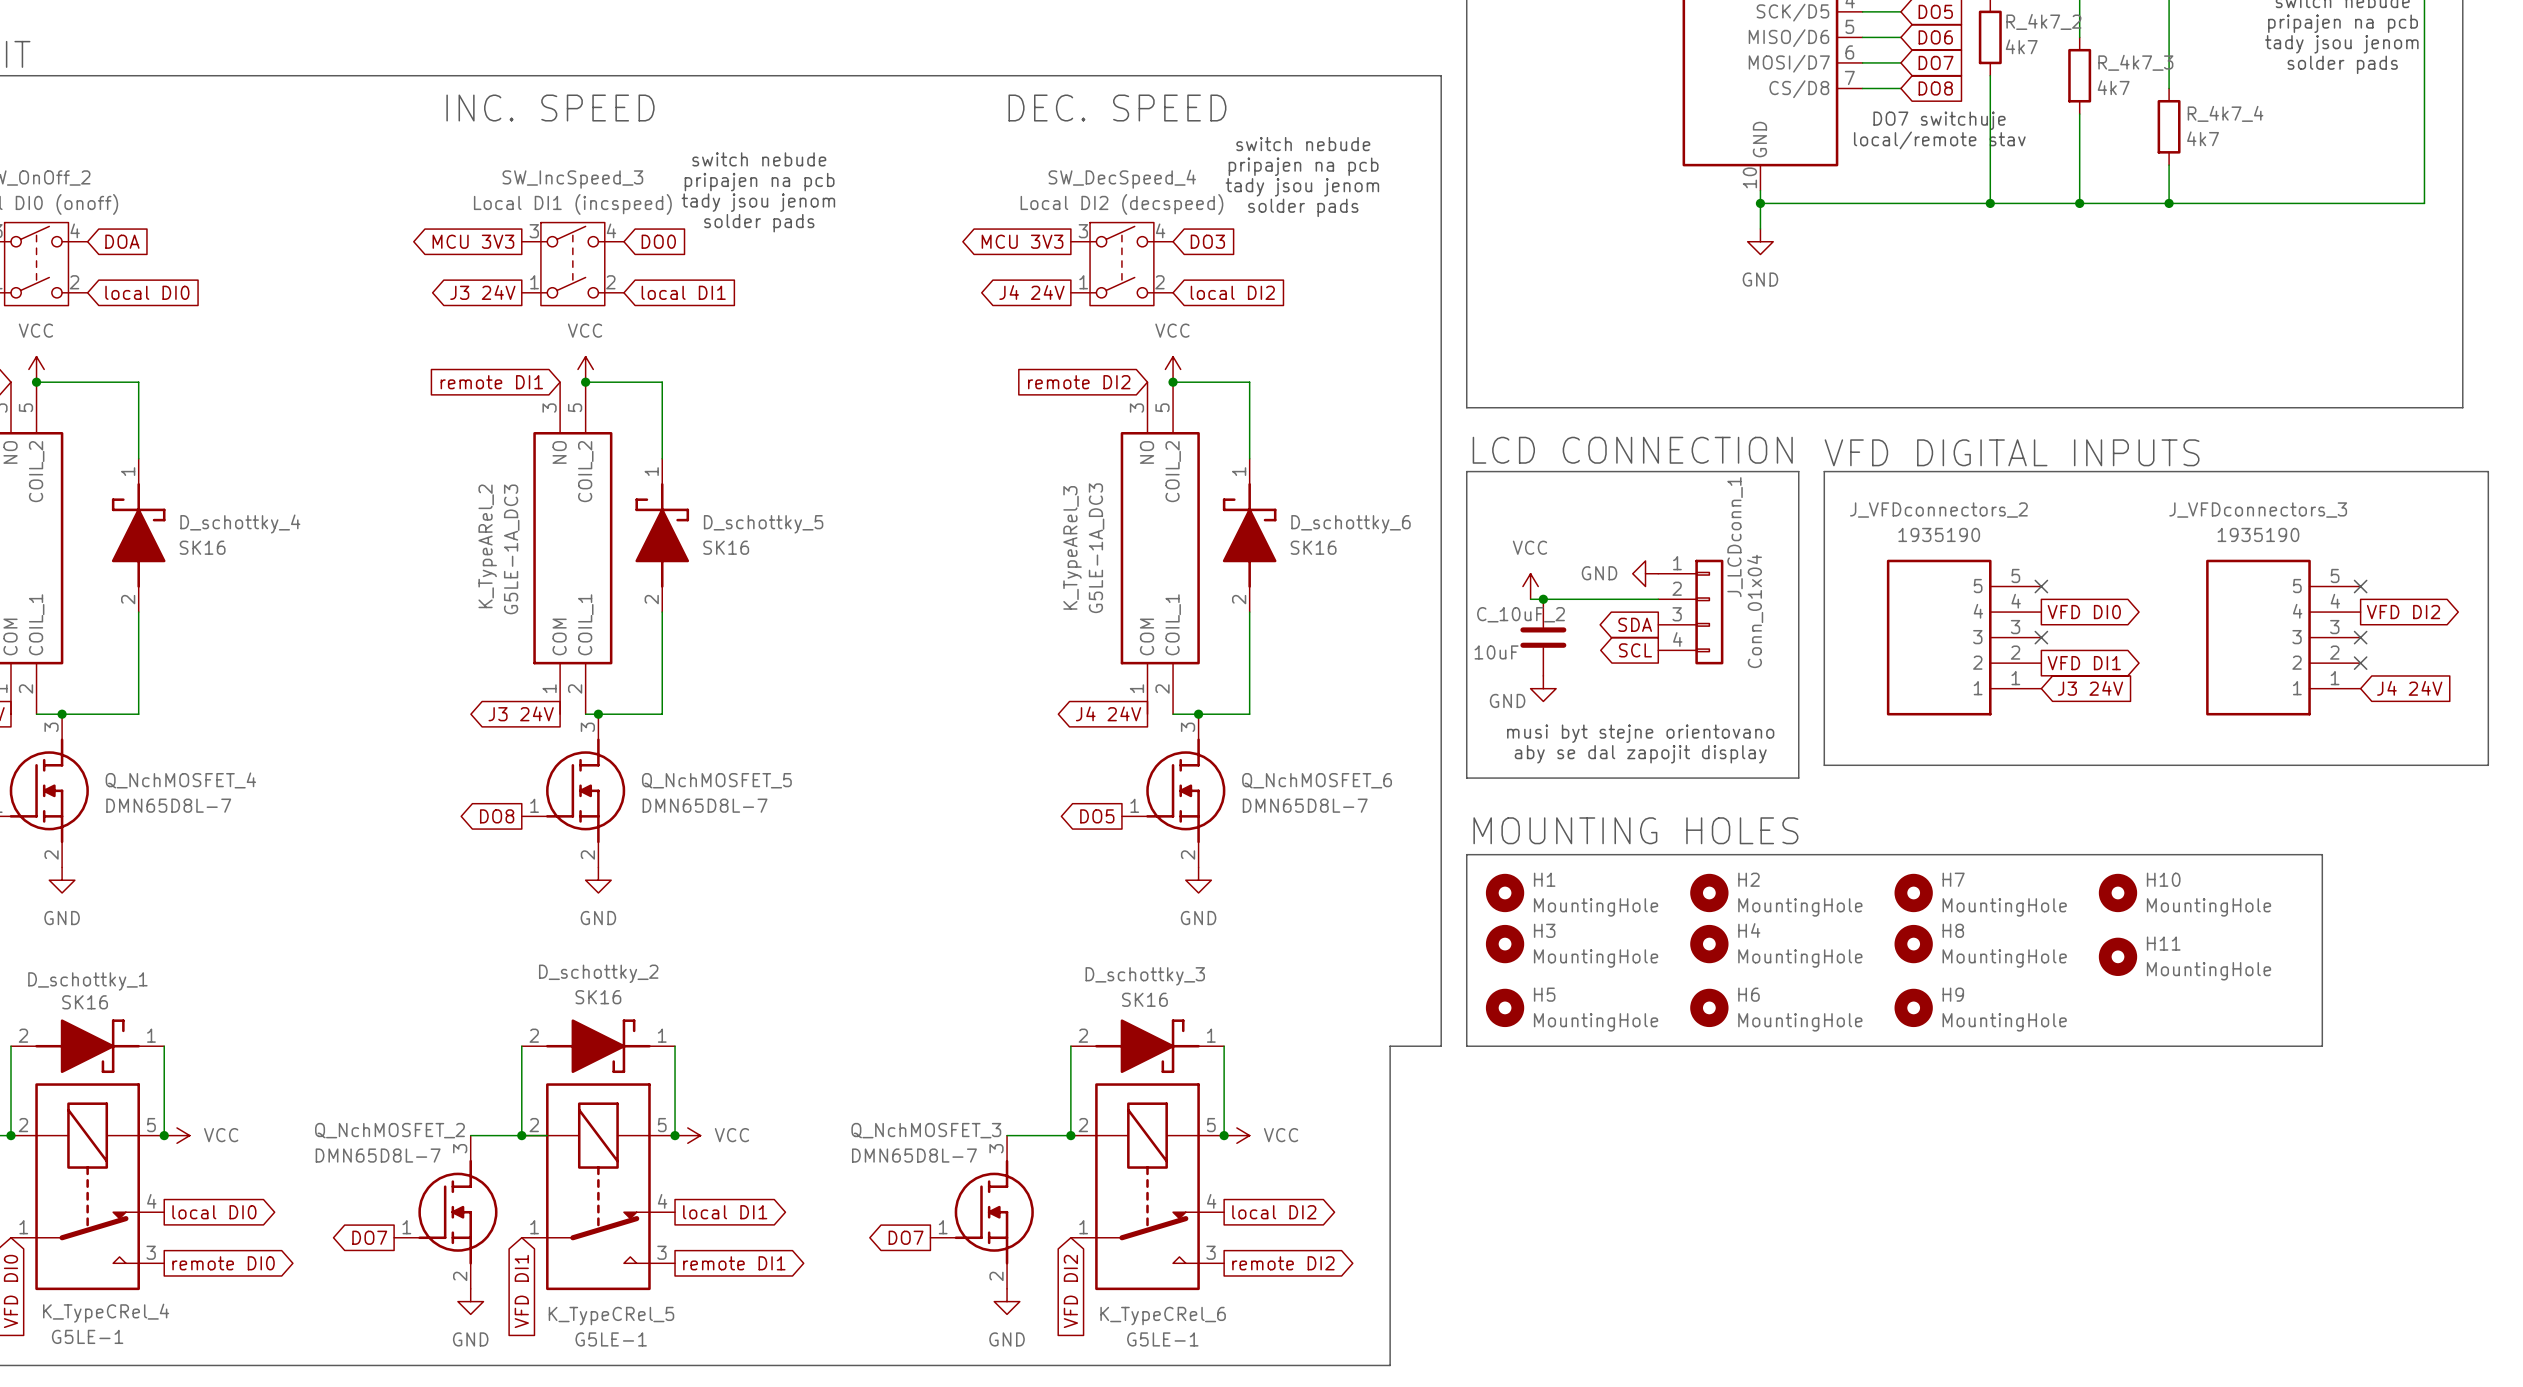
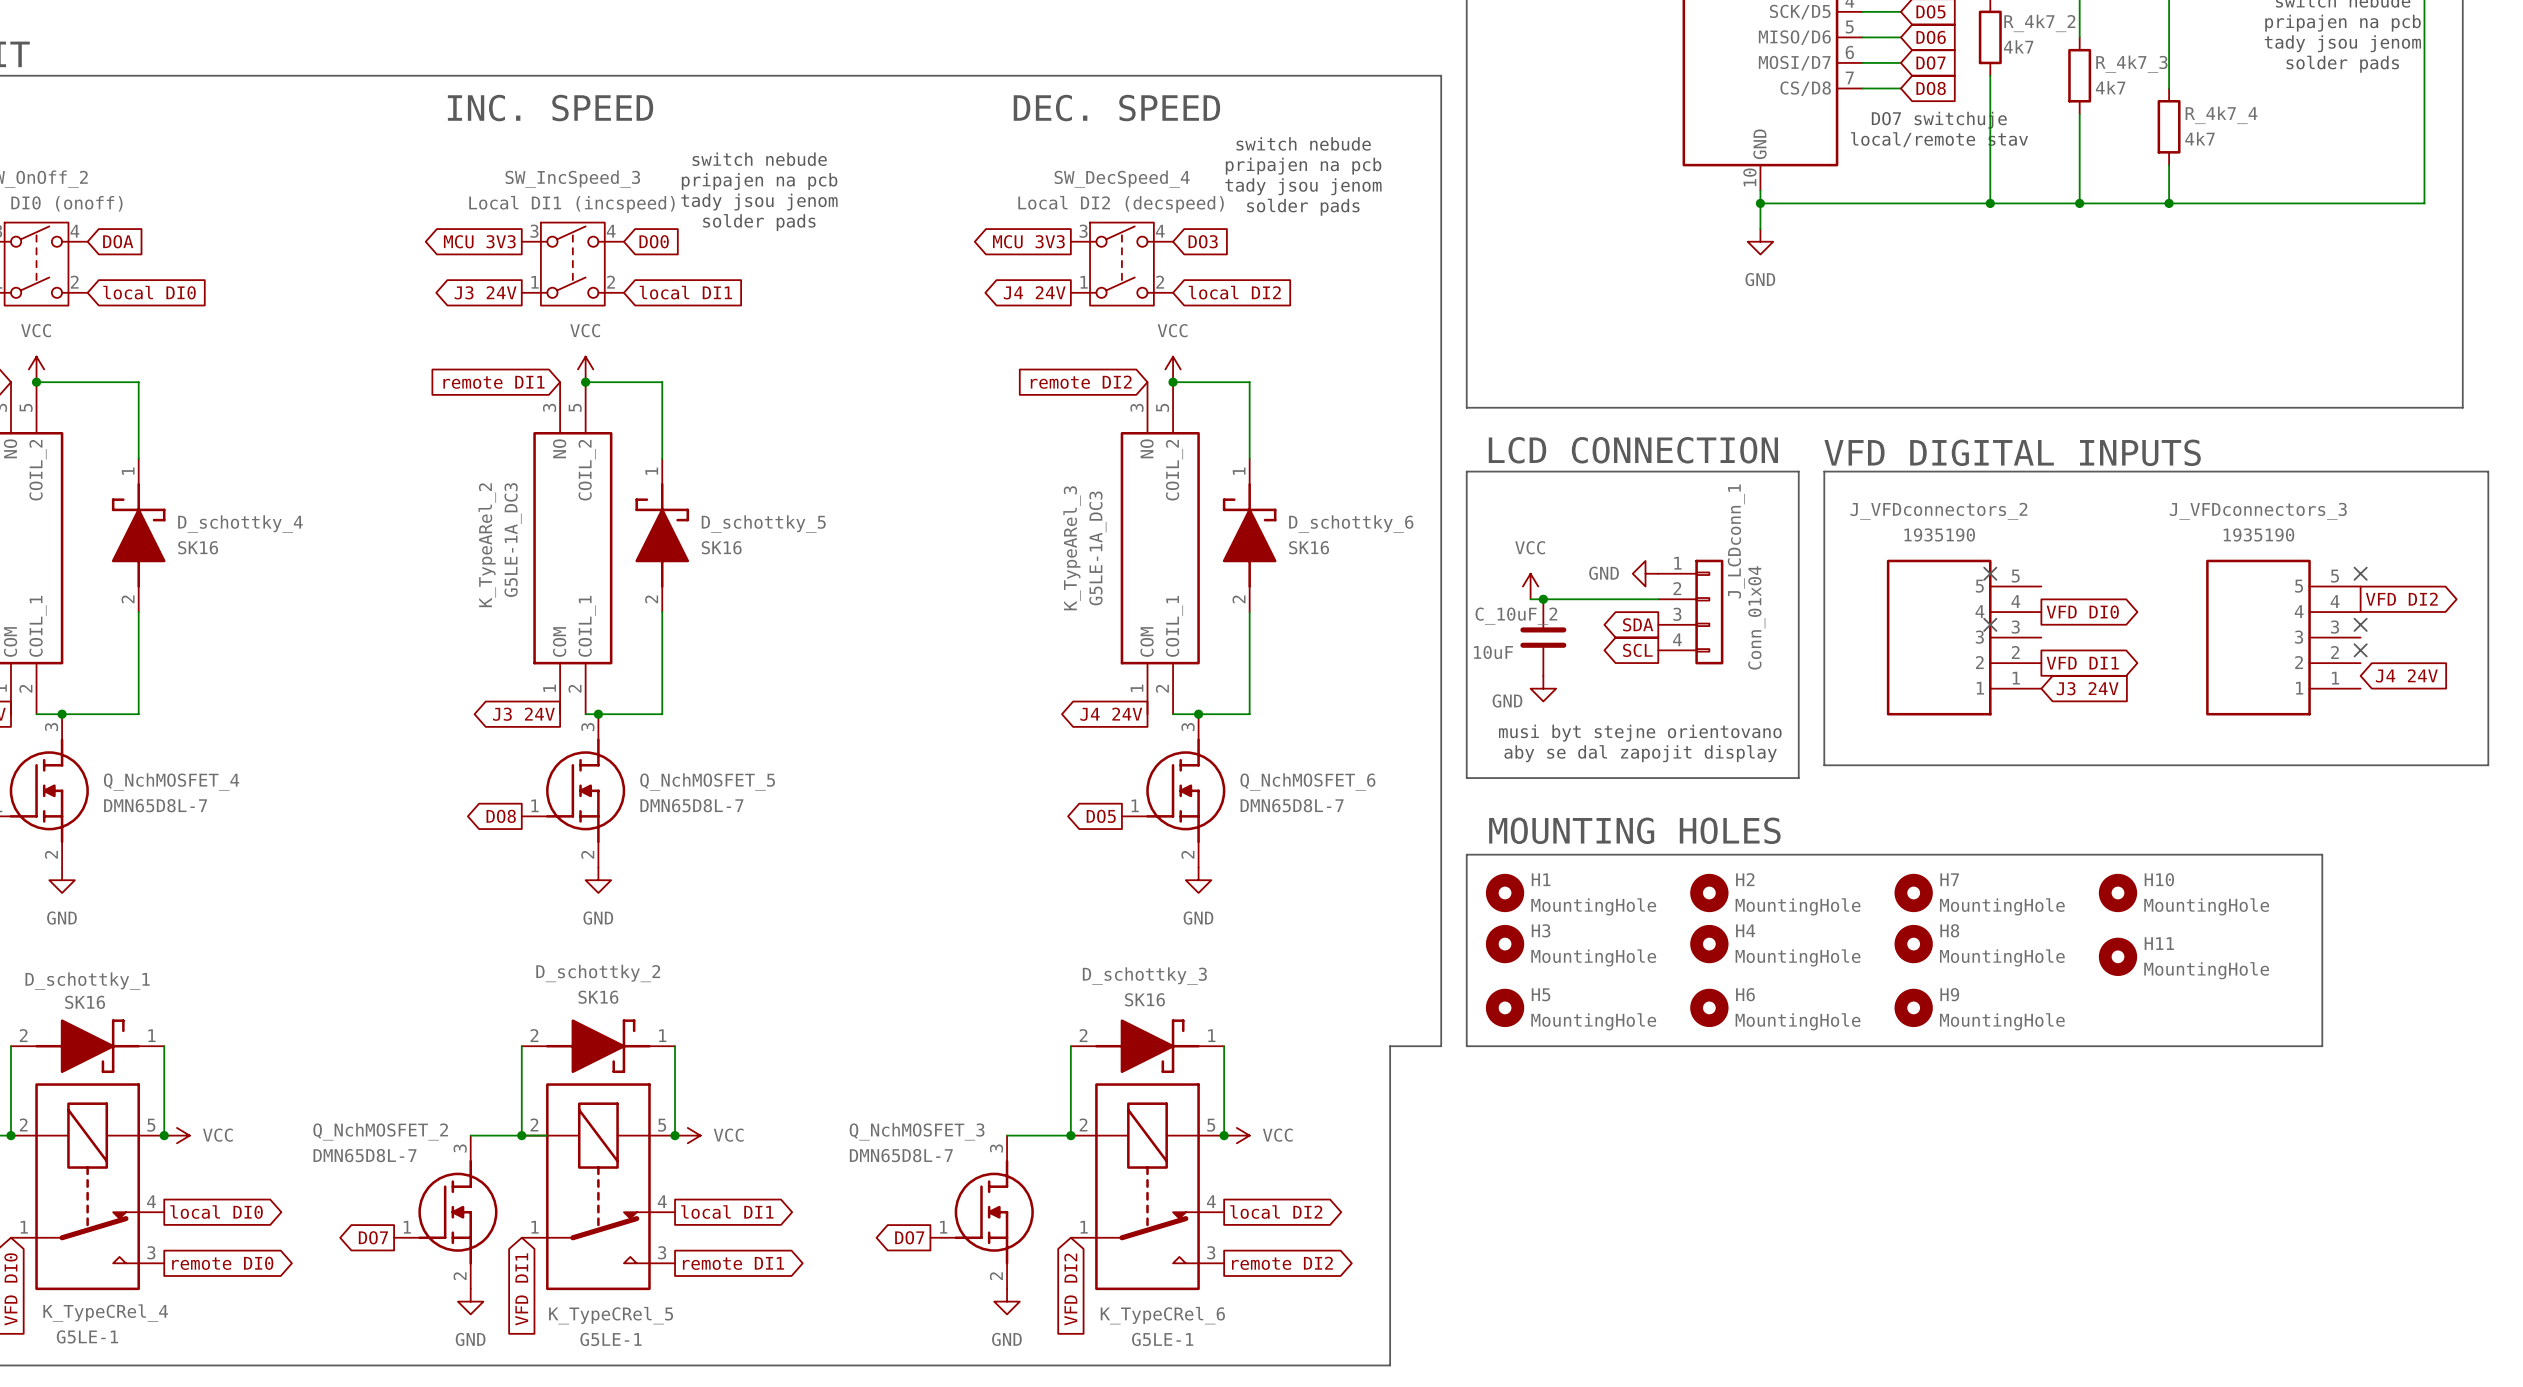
no-connect mark: none -> (1990, 573)
no-connect mark: (2041, 586) -> none
no-connect mark position: (2360, 586) -> (2360, 573)
global label position: VFD DI2 (2403, 612) -> VFD DI2 (2401, 599)
no-connect mark: none -> (1990, 624)
no-connect mark: none -> (2360, 624)
no-connect mark: (2041, 637) -> none
no-connect mark: (2360, 637) -> none
no-connect mark: none -> (2360, 650)
no-connect mark: (2360, 663) -> none
global label position: J4 24V (2409, 688) -> J4 24V (2406, 675)

